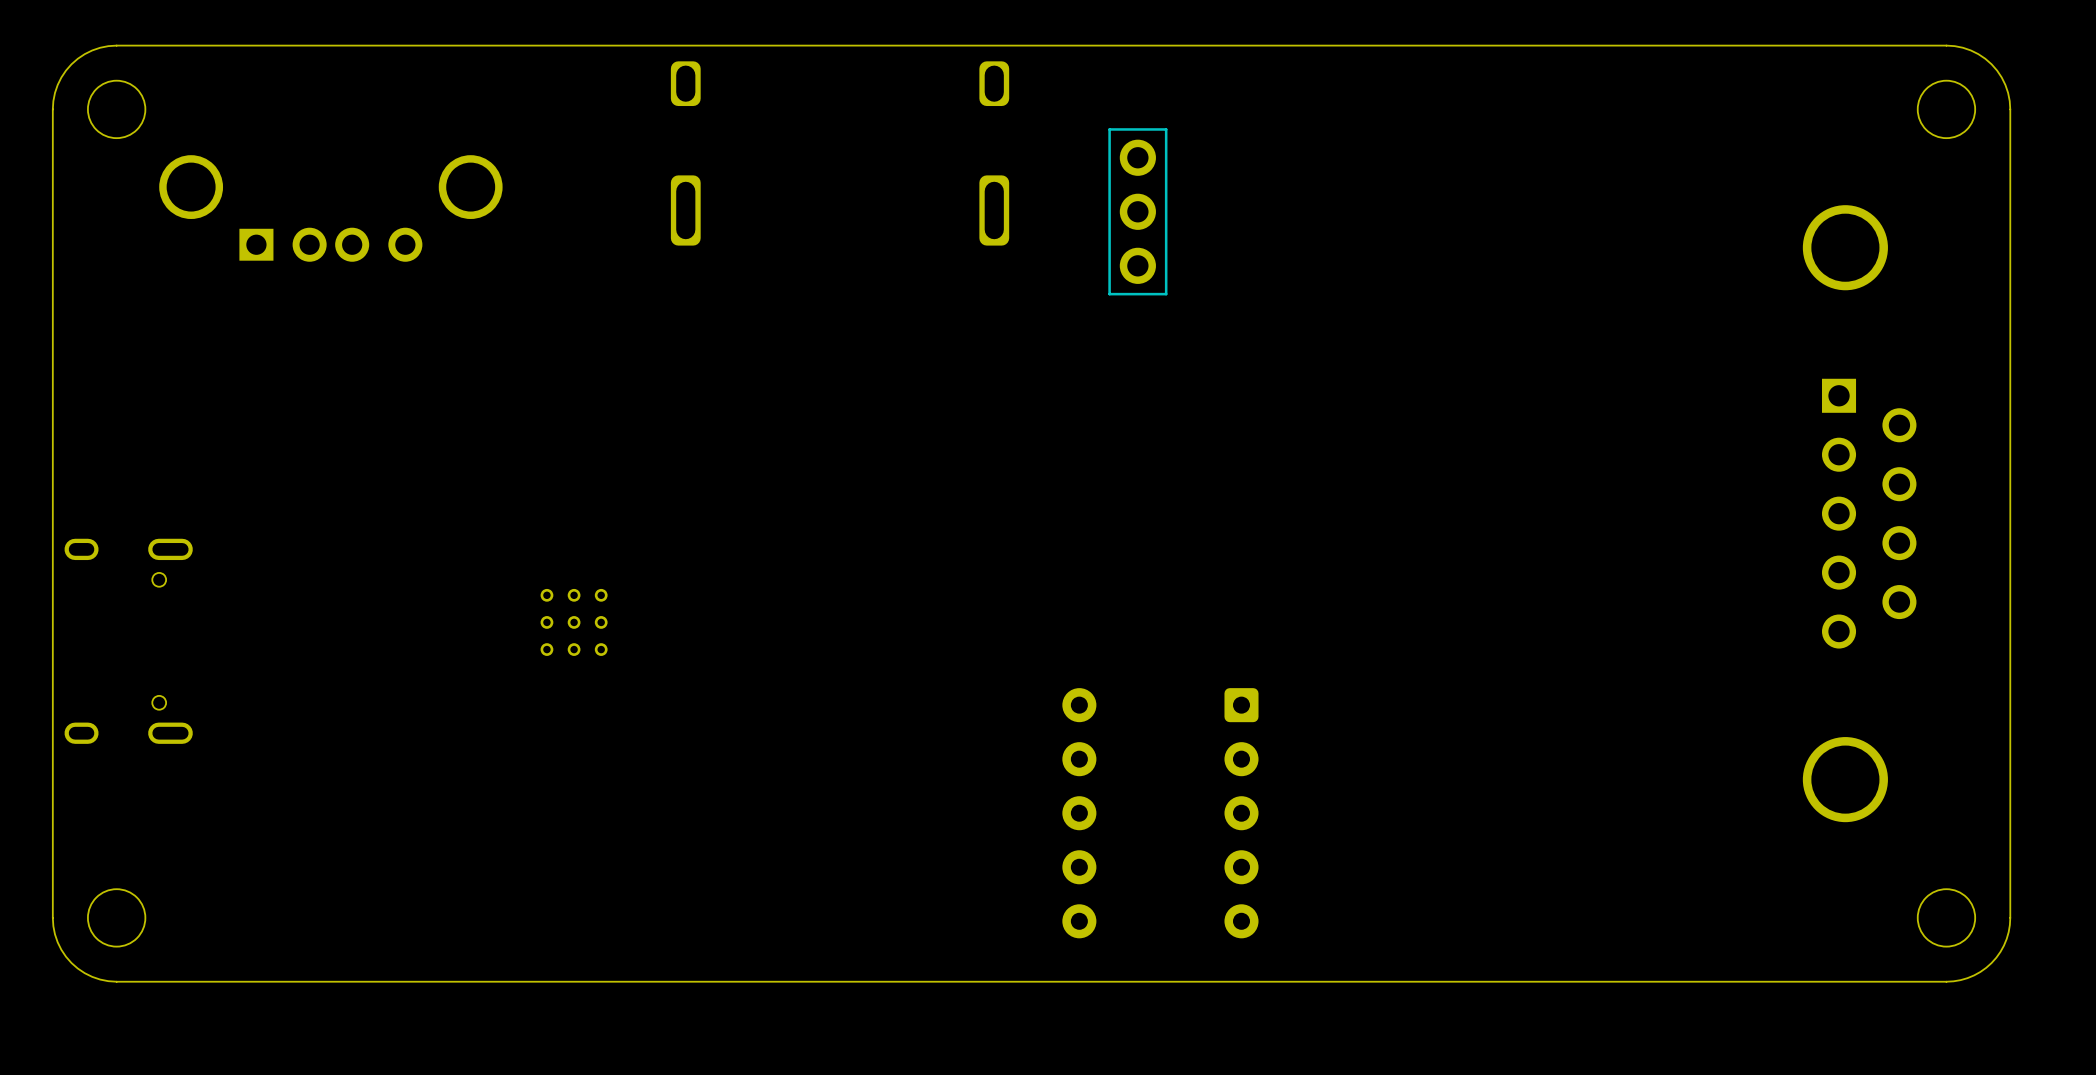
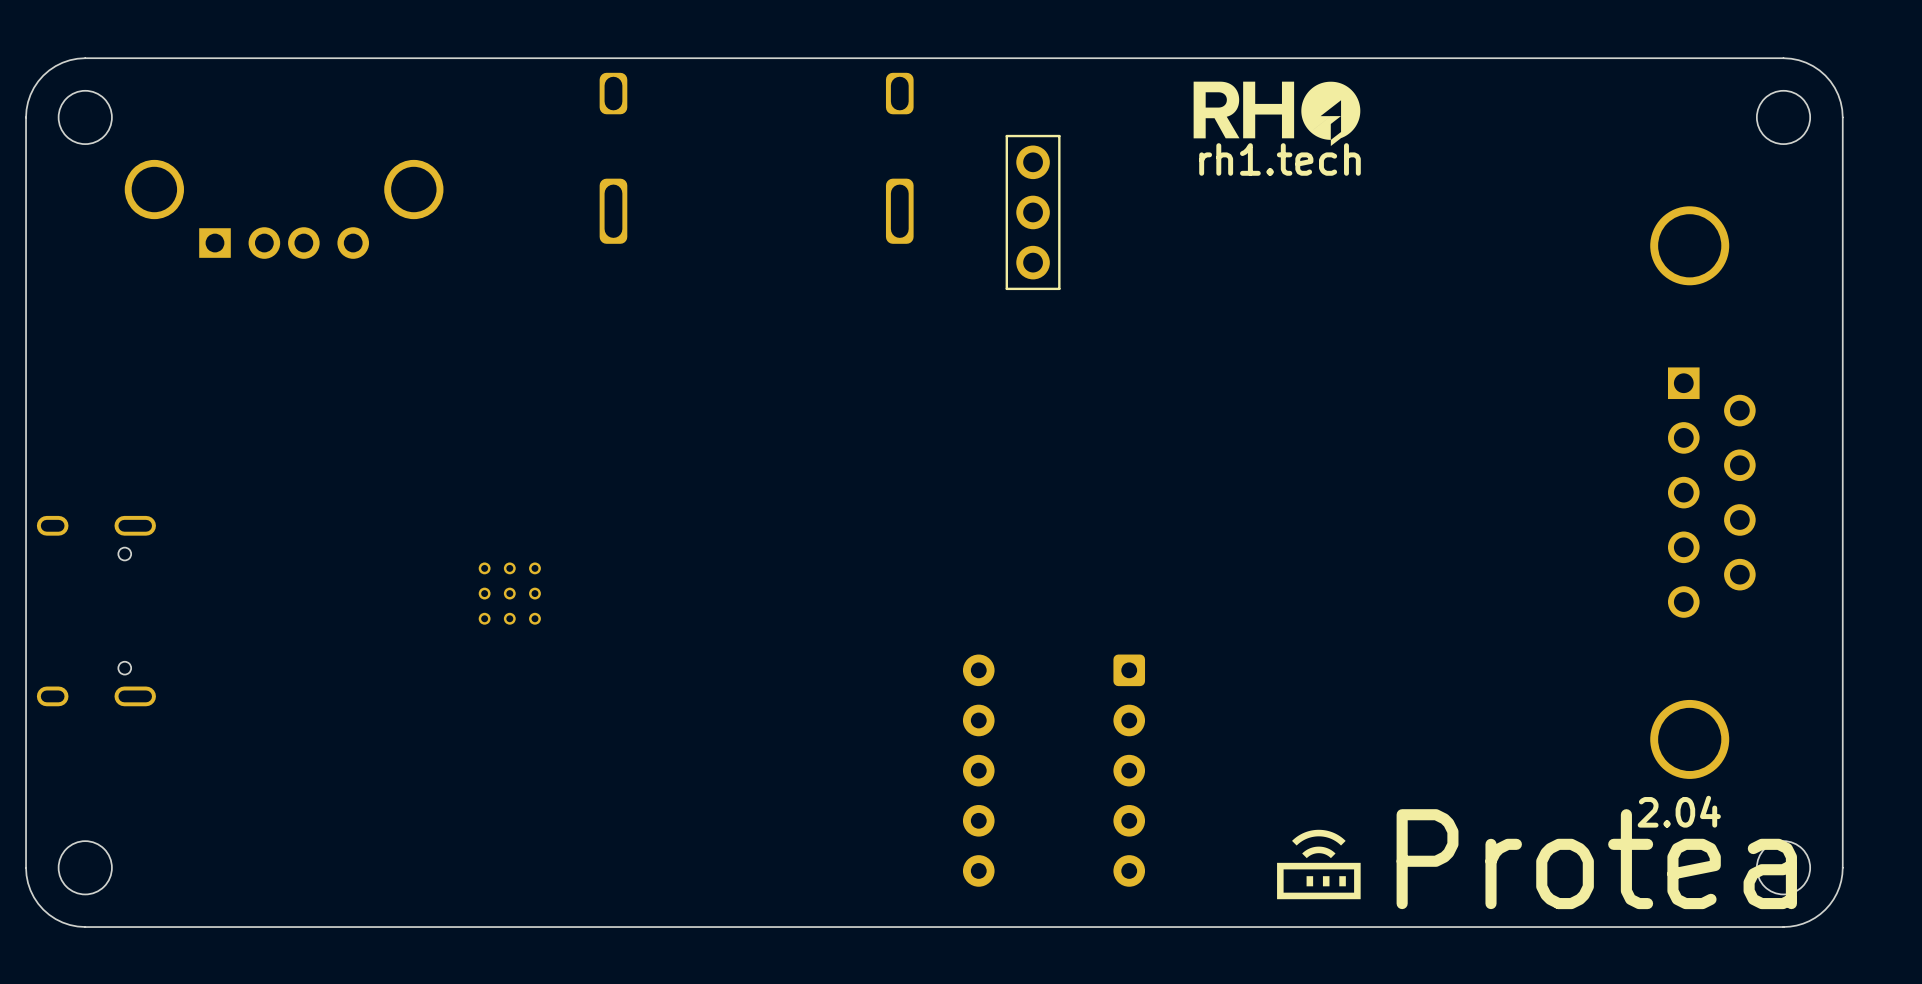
drawing: none -> [1193, 81, 1361, 147]
text: none -> rh1.tech (1280, 159)
text: none -> 2.04 (1679, 811)
drawing: none -> [1277, 829, 1361, 900]
text: none -> Protea (1596, 859)

